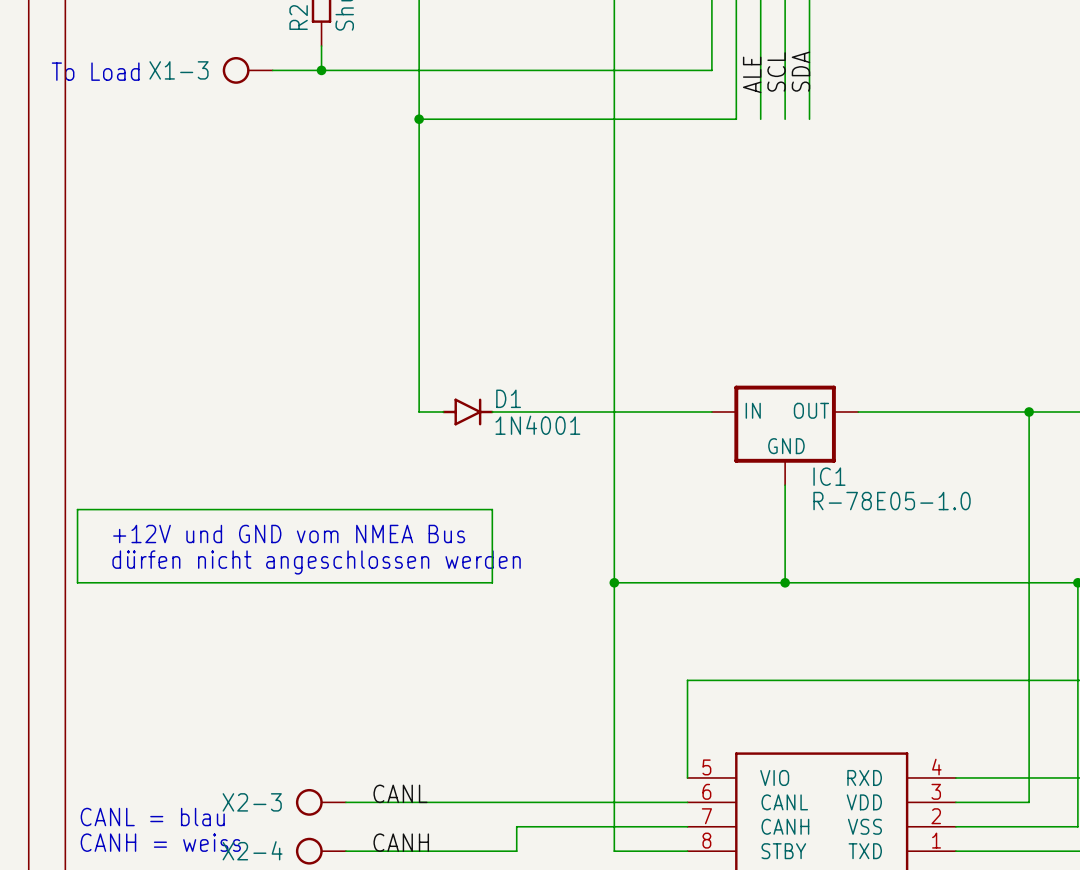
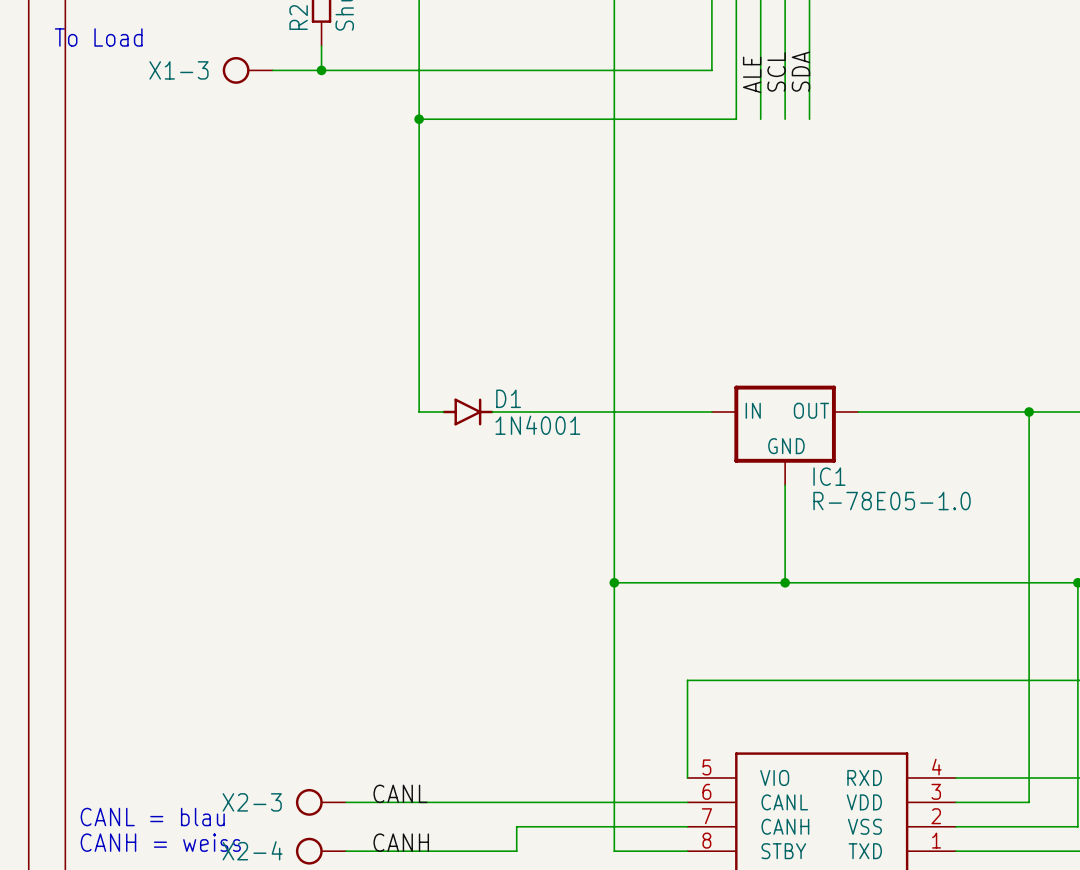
text position: To Load (95, 71) -> To Load (98, 37)
wire: (77, 509) (492, 509) (492, 582) (77, 582) (77, 509) -> none
text: +12V und GND vom NMEA Bus (289, 533) -> none
text: dürfen nicht angeschlossen werden (316, 562) -> none

